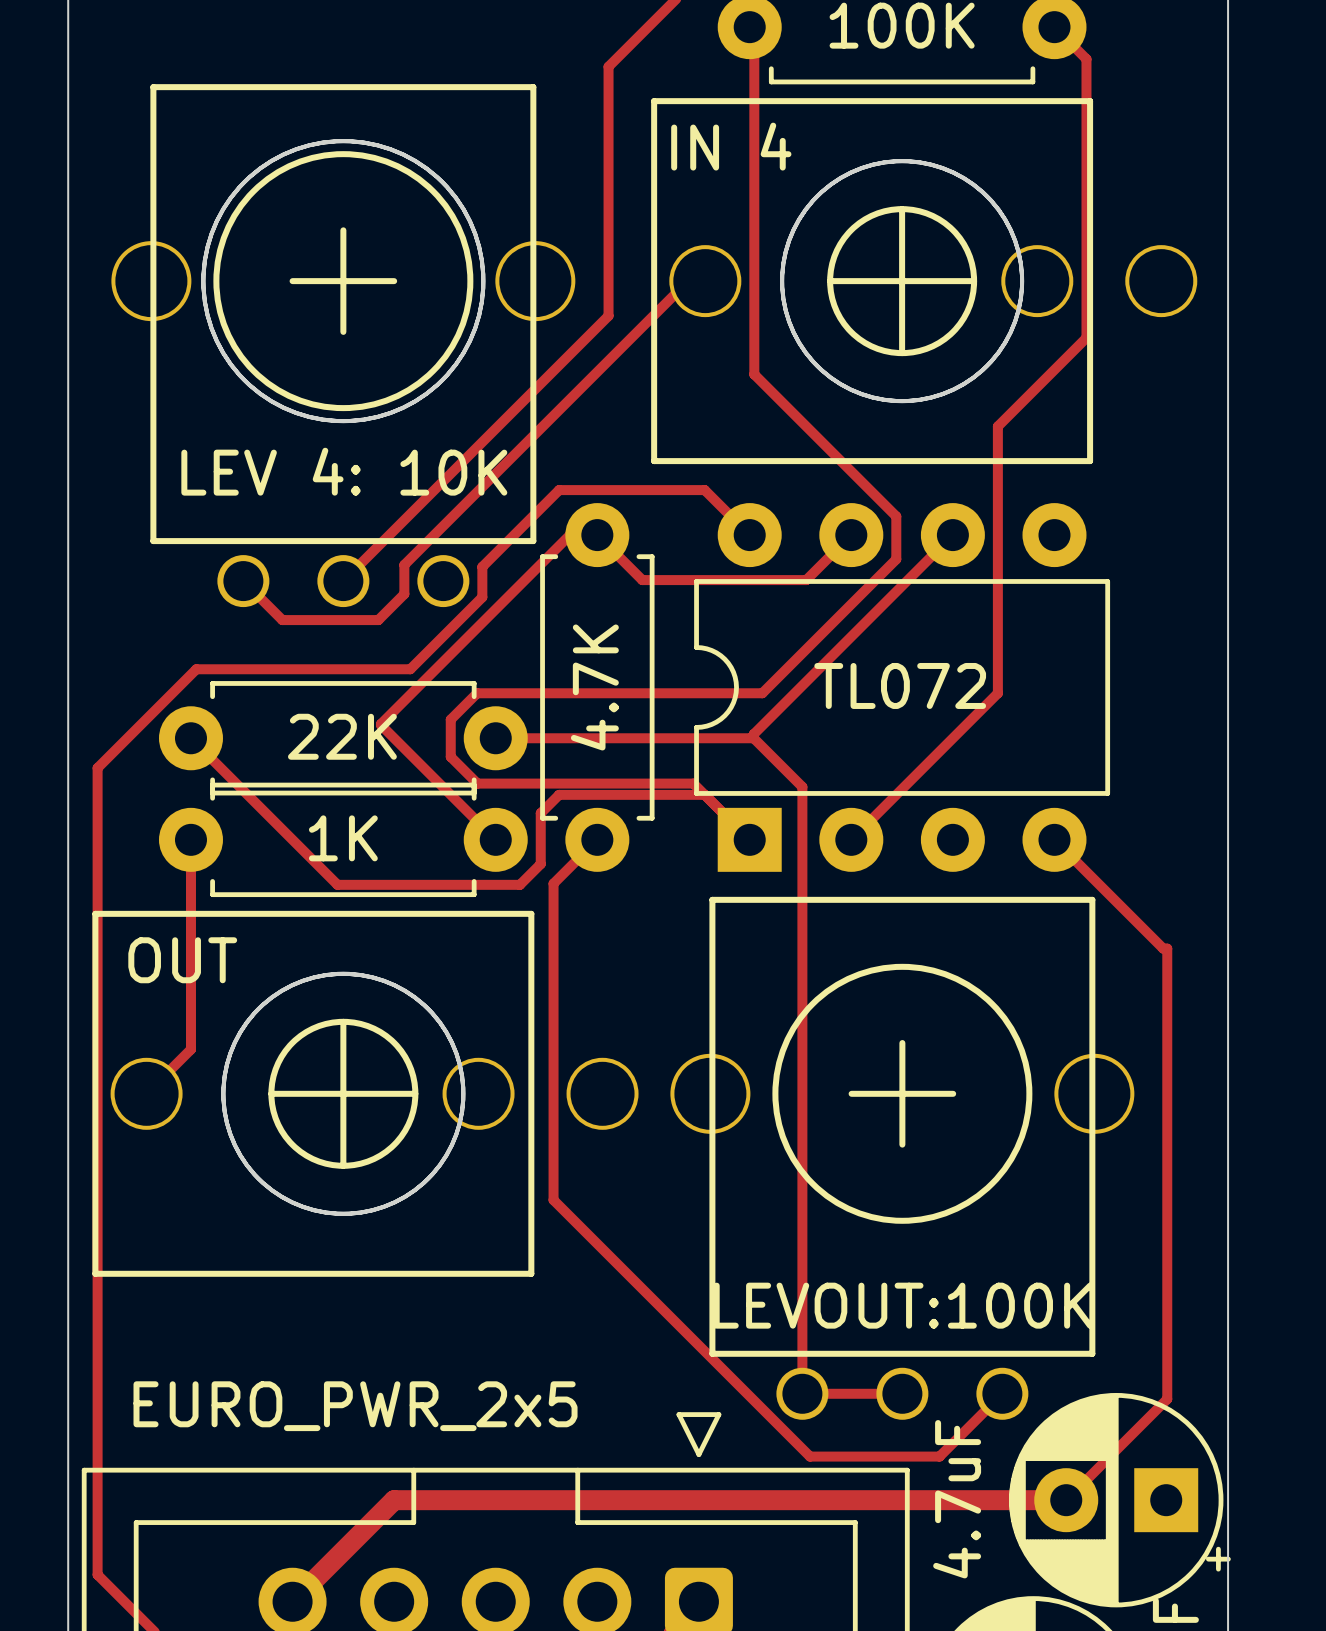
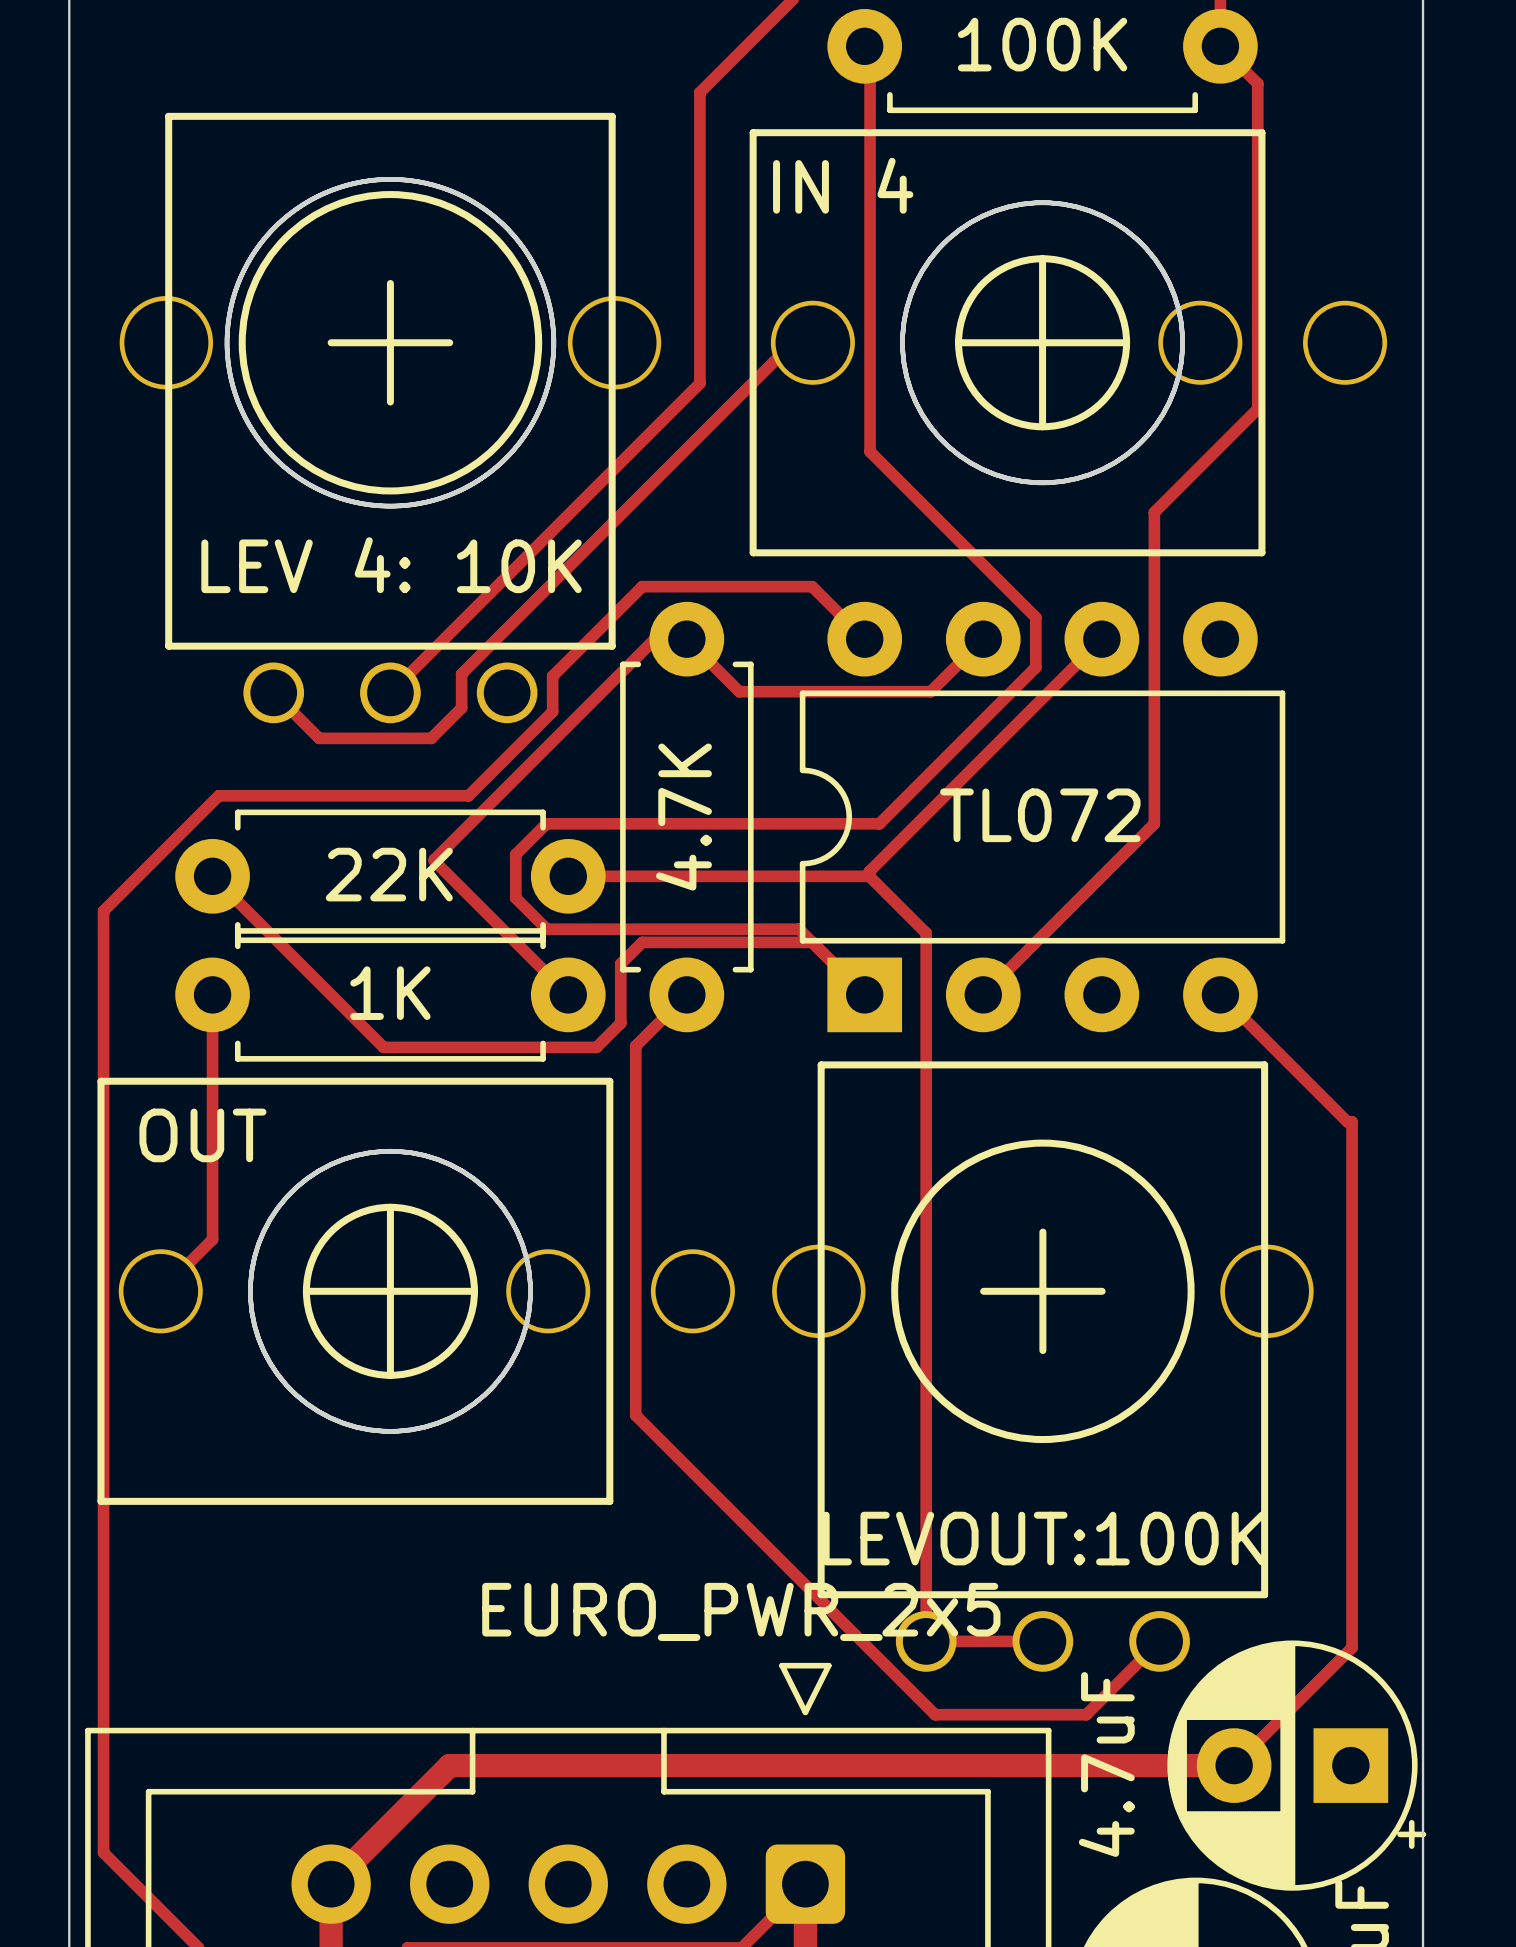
part value position: EURO_PWR_2x5 (355, 1406) -> EURO_PWR_2x5 (741, 1611)

